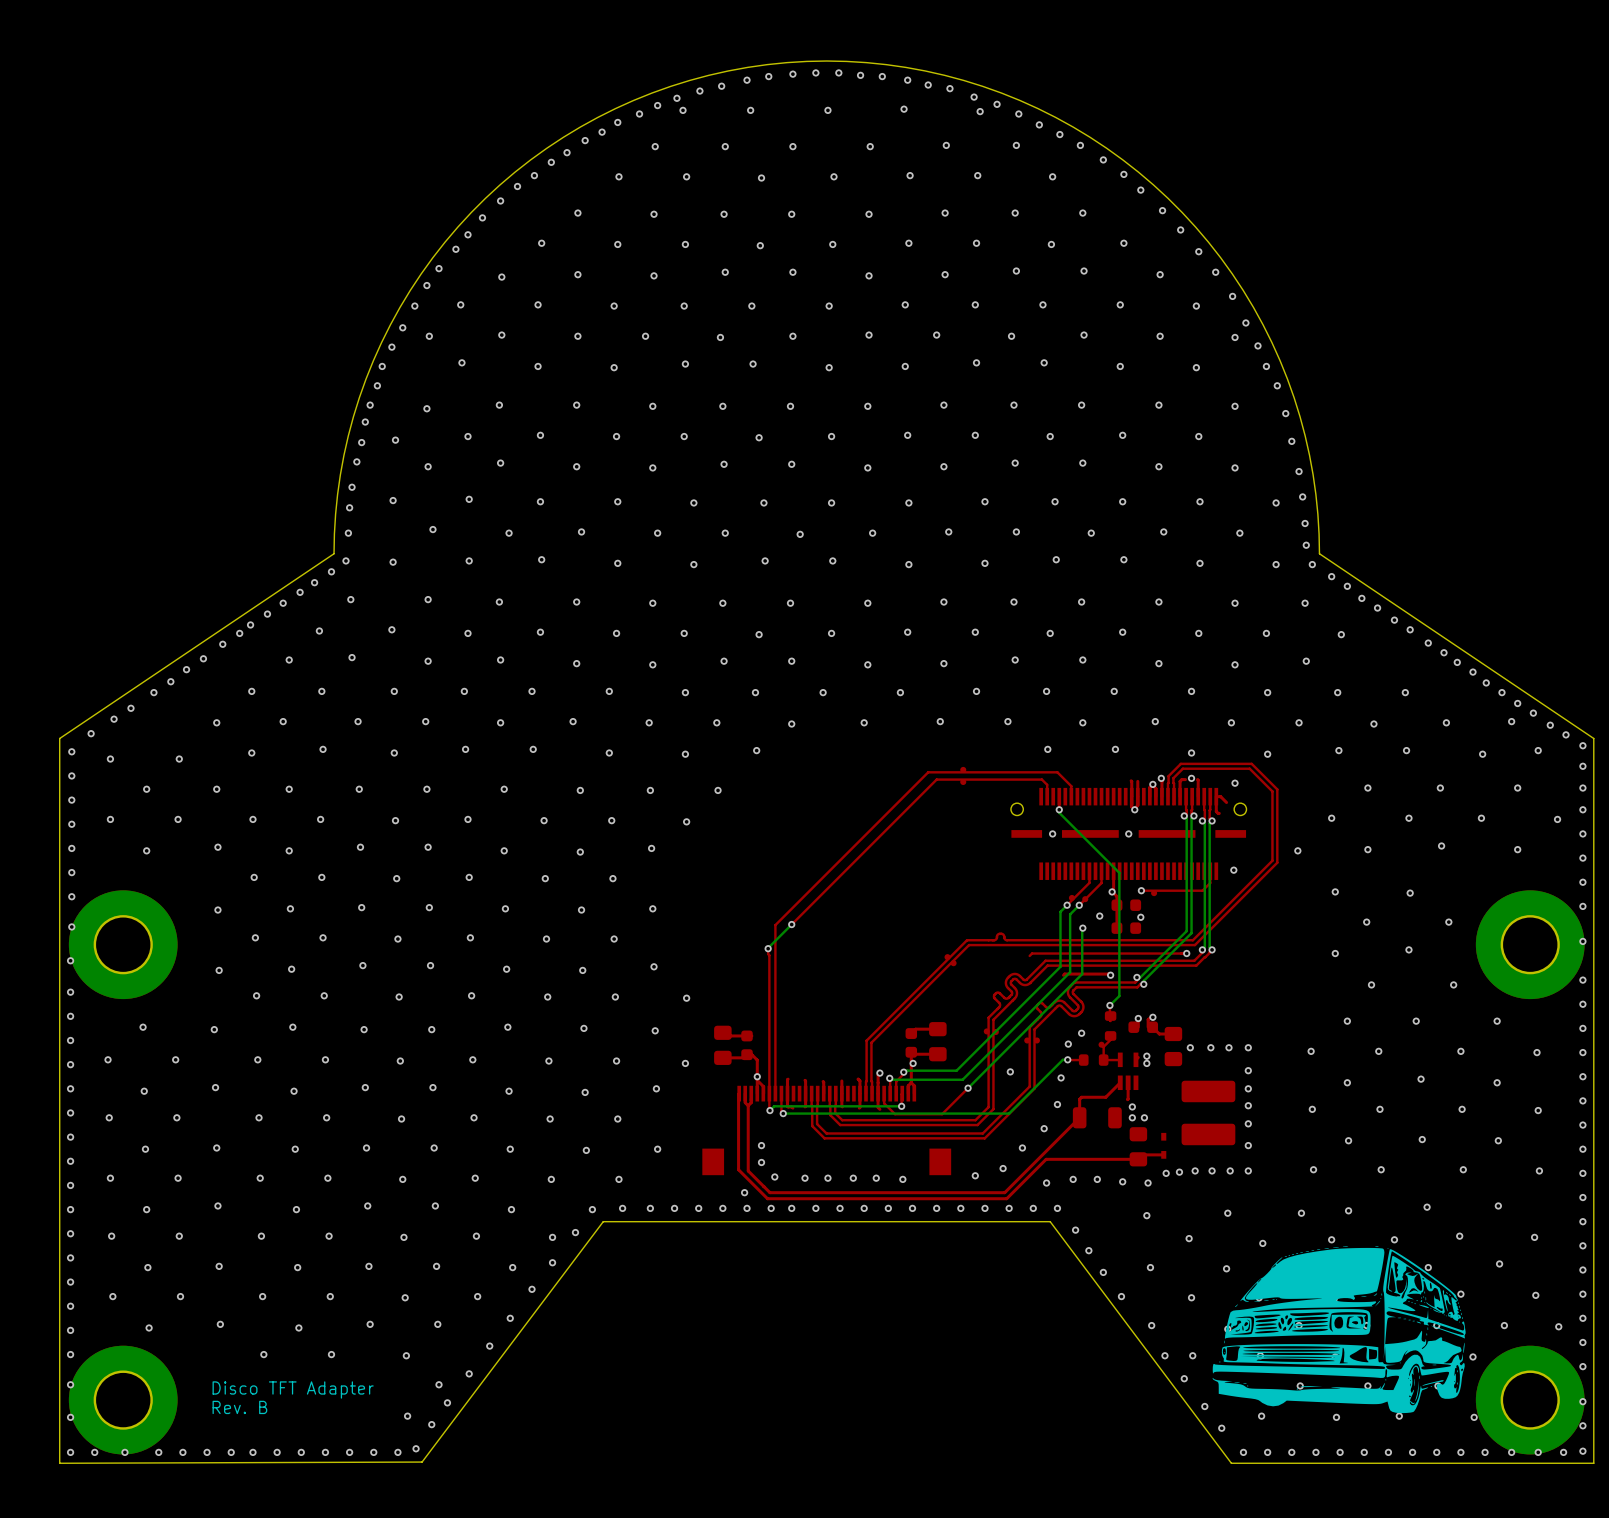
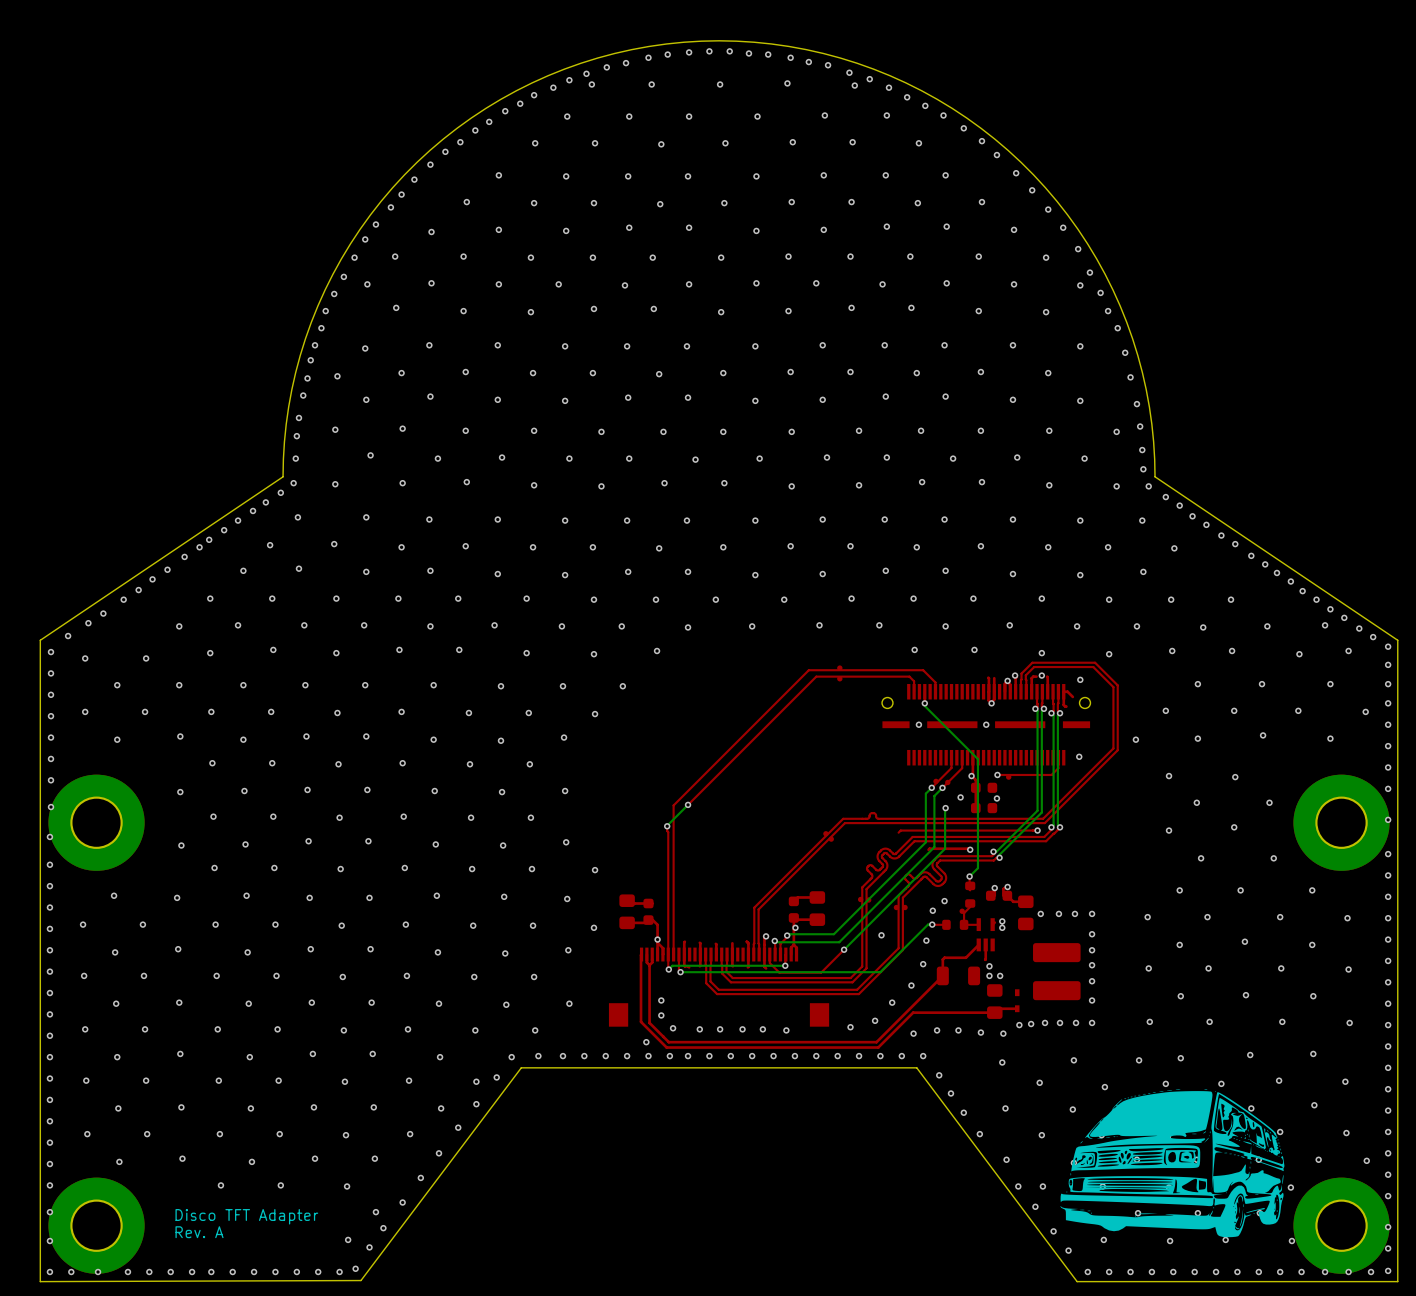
text: Rev. B (239, 1407) -> Rev. A (199, 1232)

